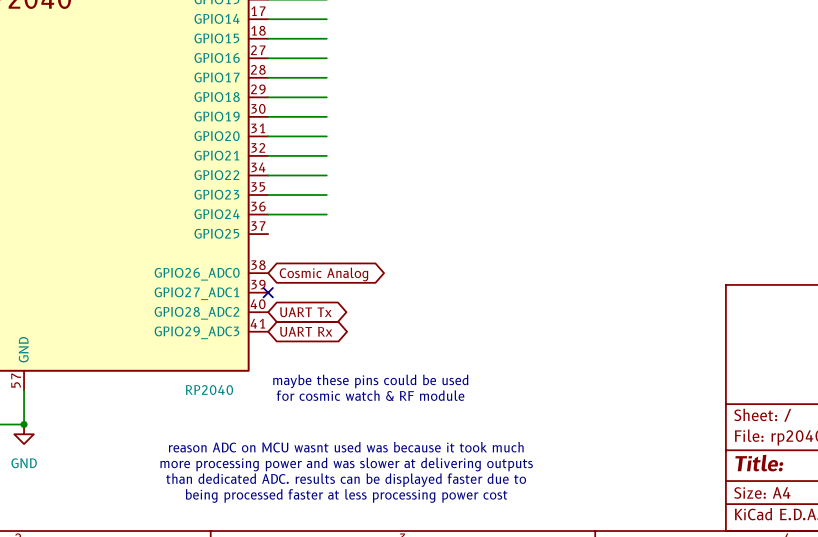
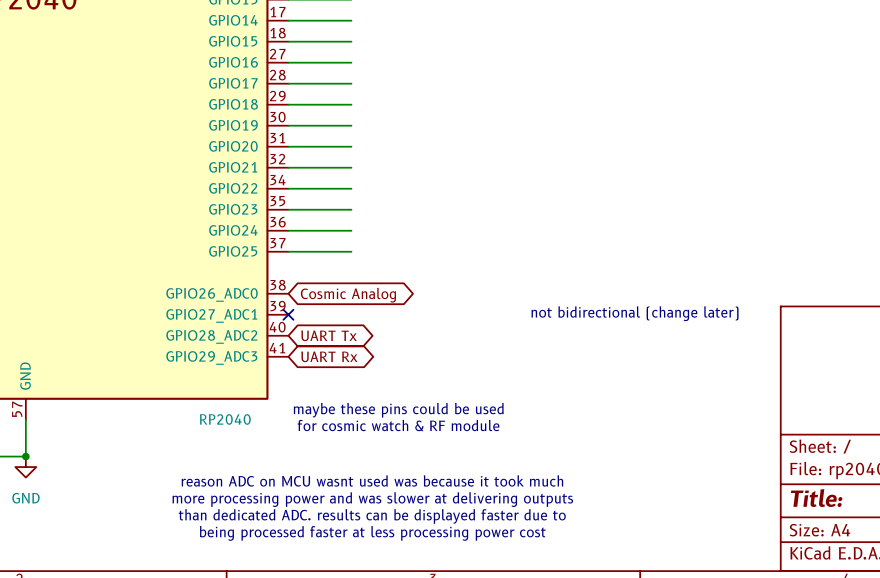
wire: none -> (288, 251) (351, 251)
text: none -> not bidirectional (change later) (635, 313)

